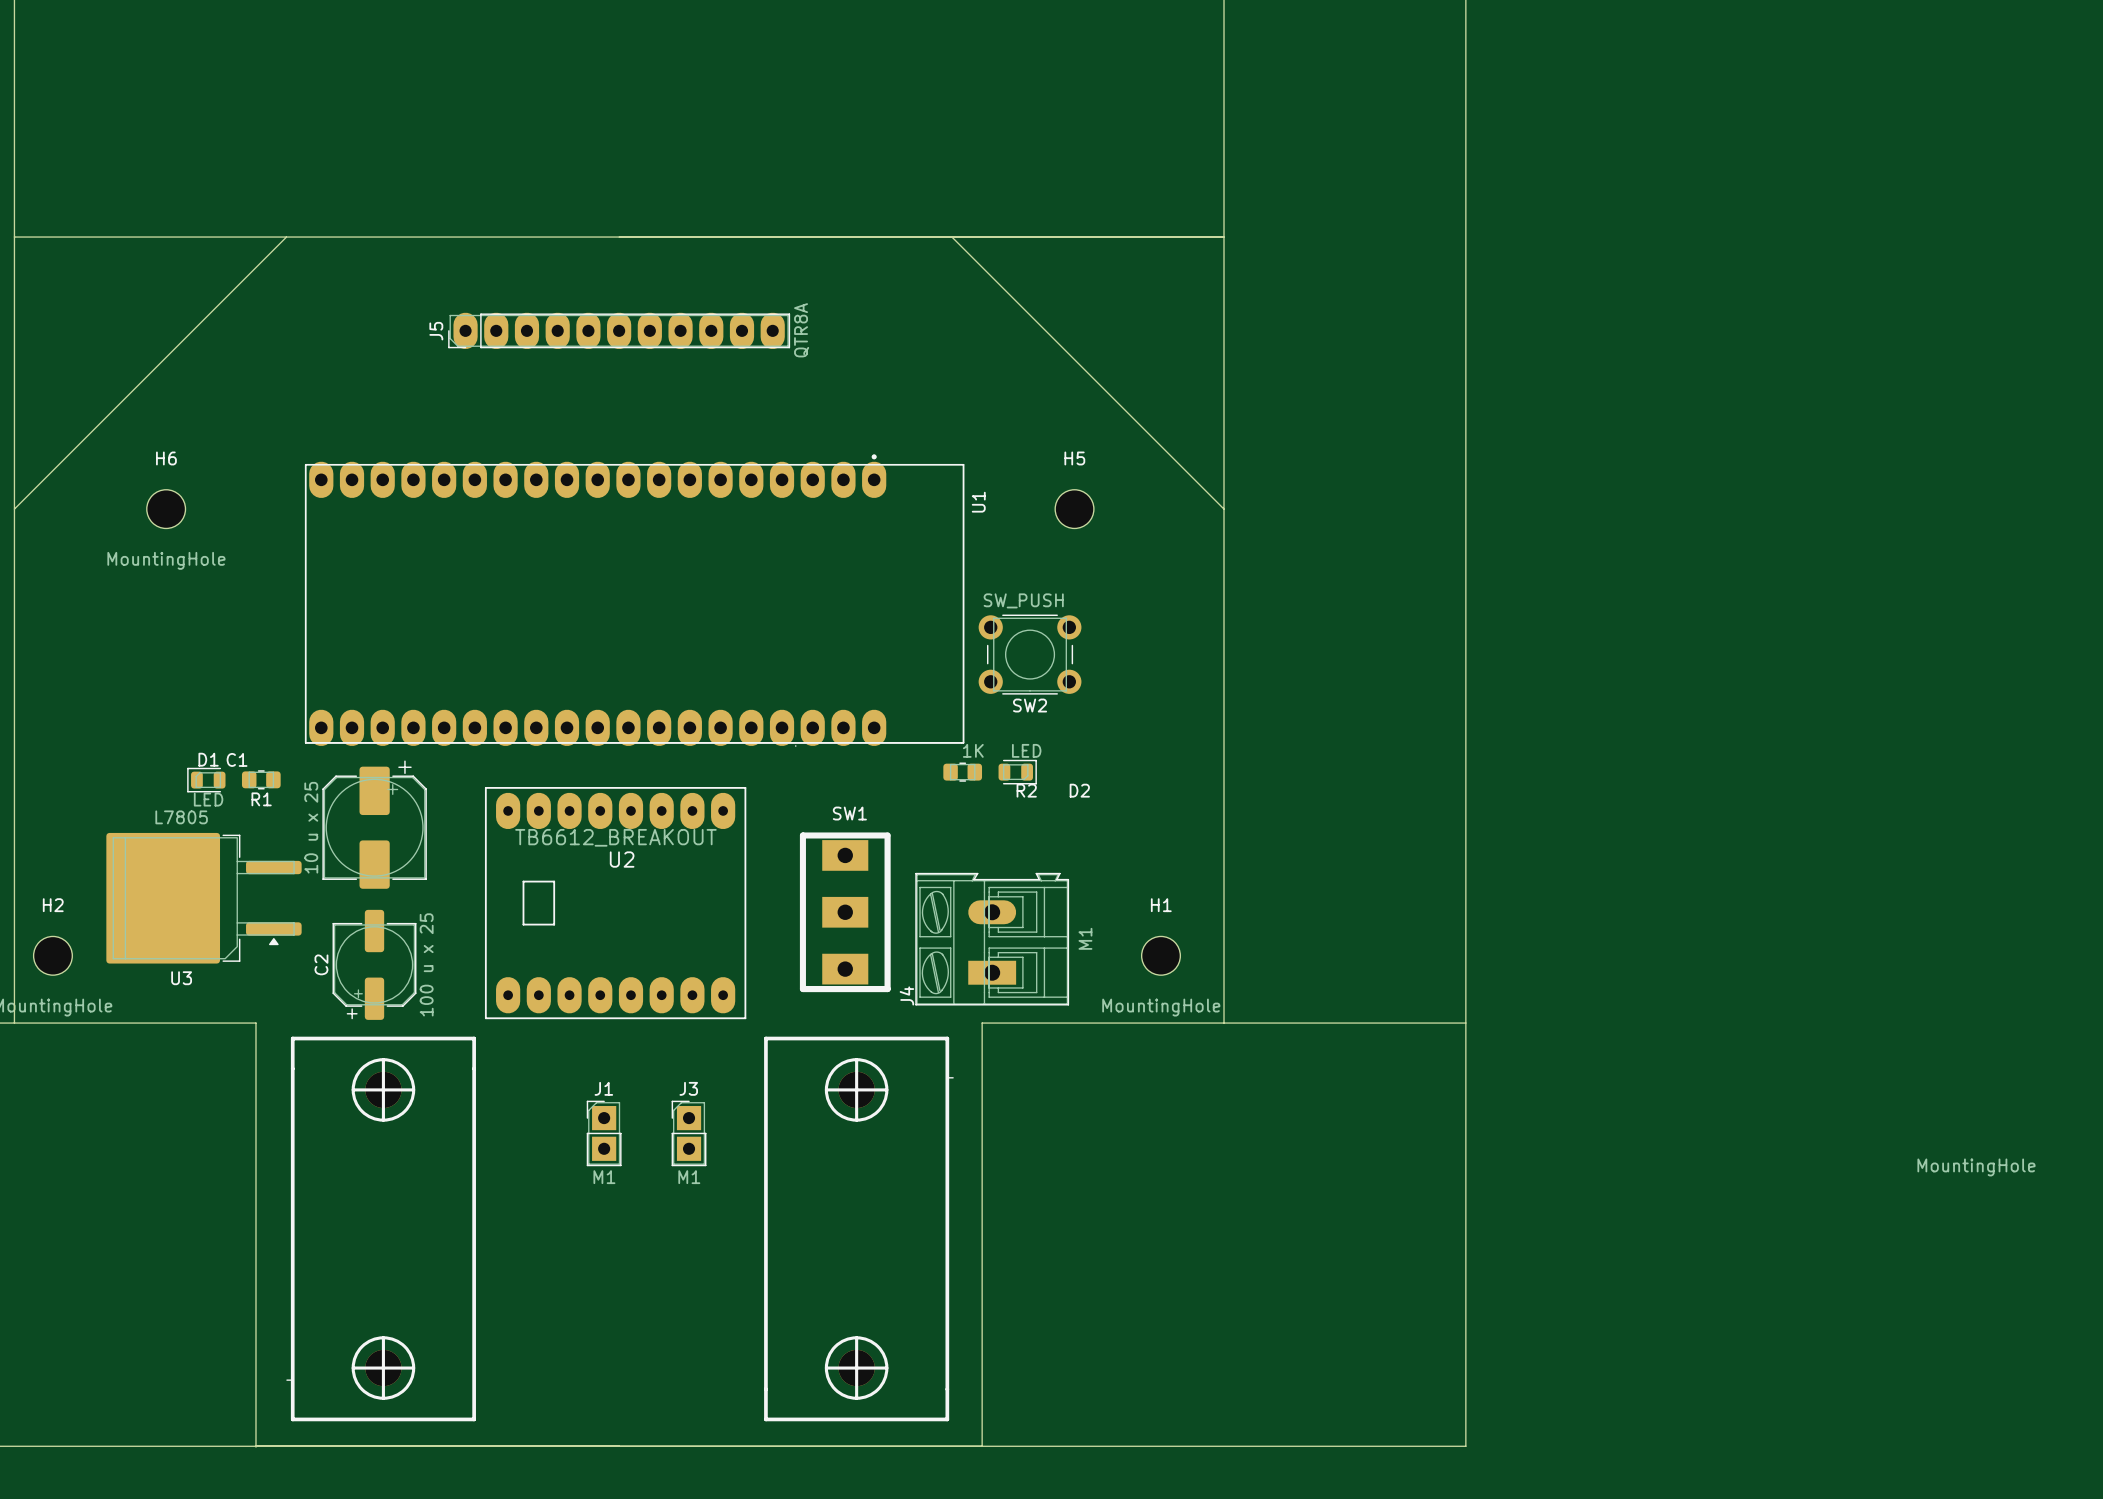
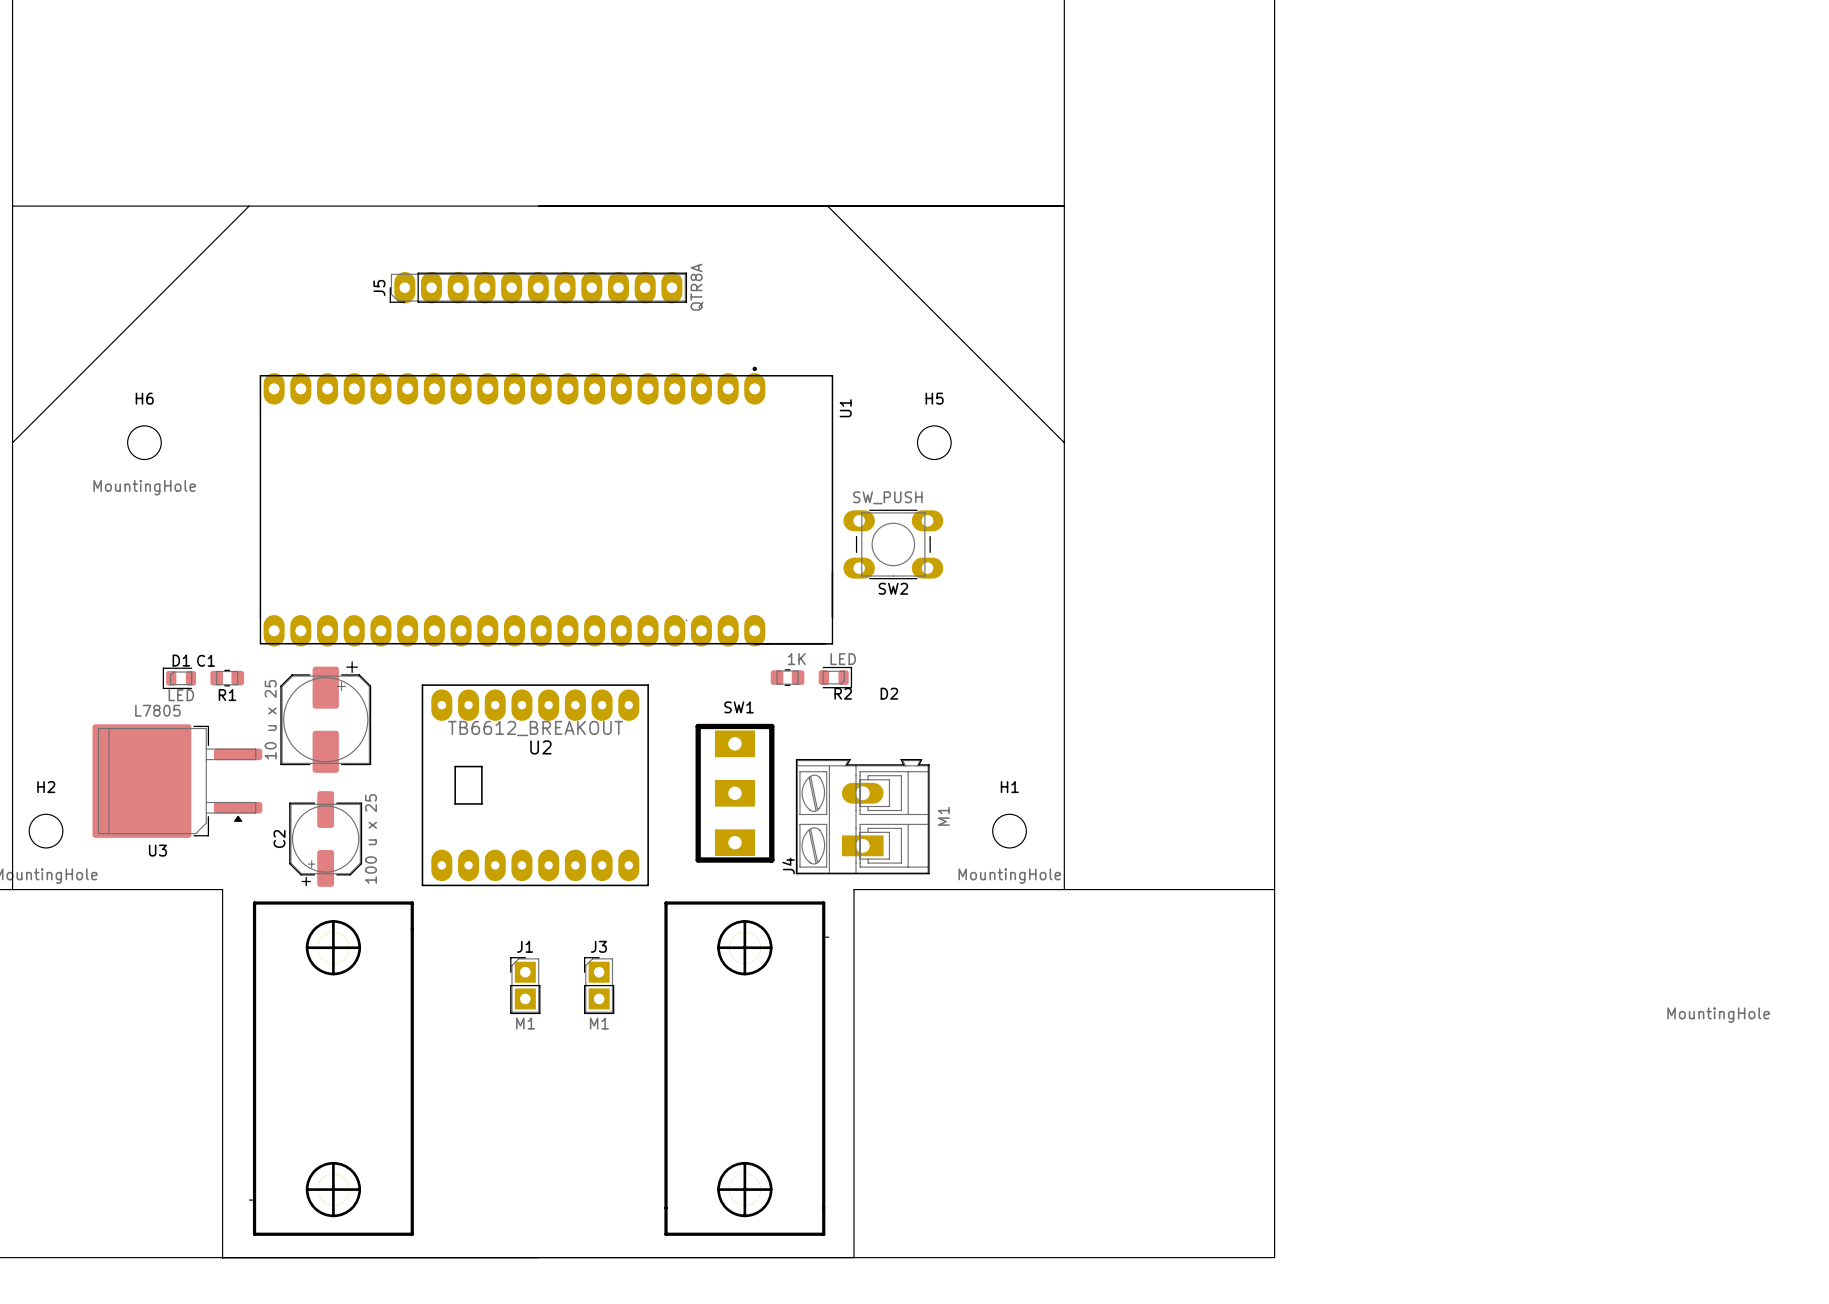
U1 footprint: [304, 454, 965, 747] -> [259, 366, 834, 647]
SW2 footprint: [978, 614, 1082, 695] -> [843, 509, 944, 580]
R2 position: (962, 772) -> (787, 677)
D2 position: (1017, 772) -> (835, 677)

